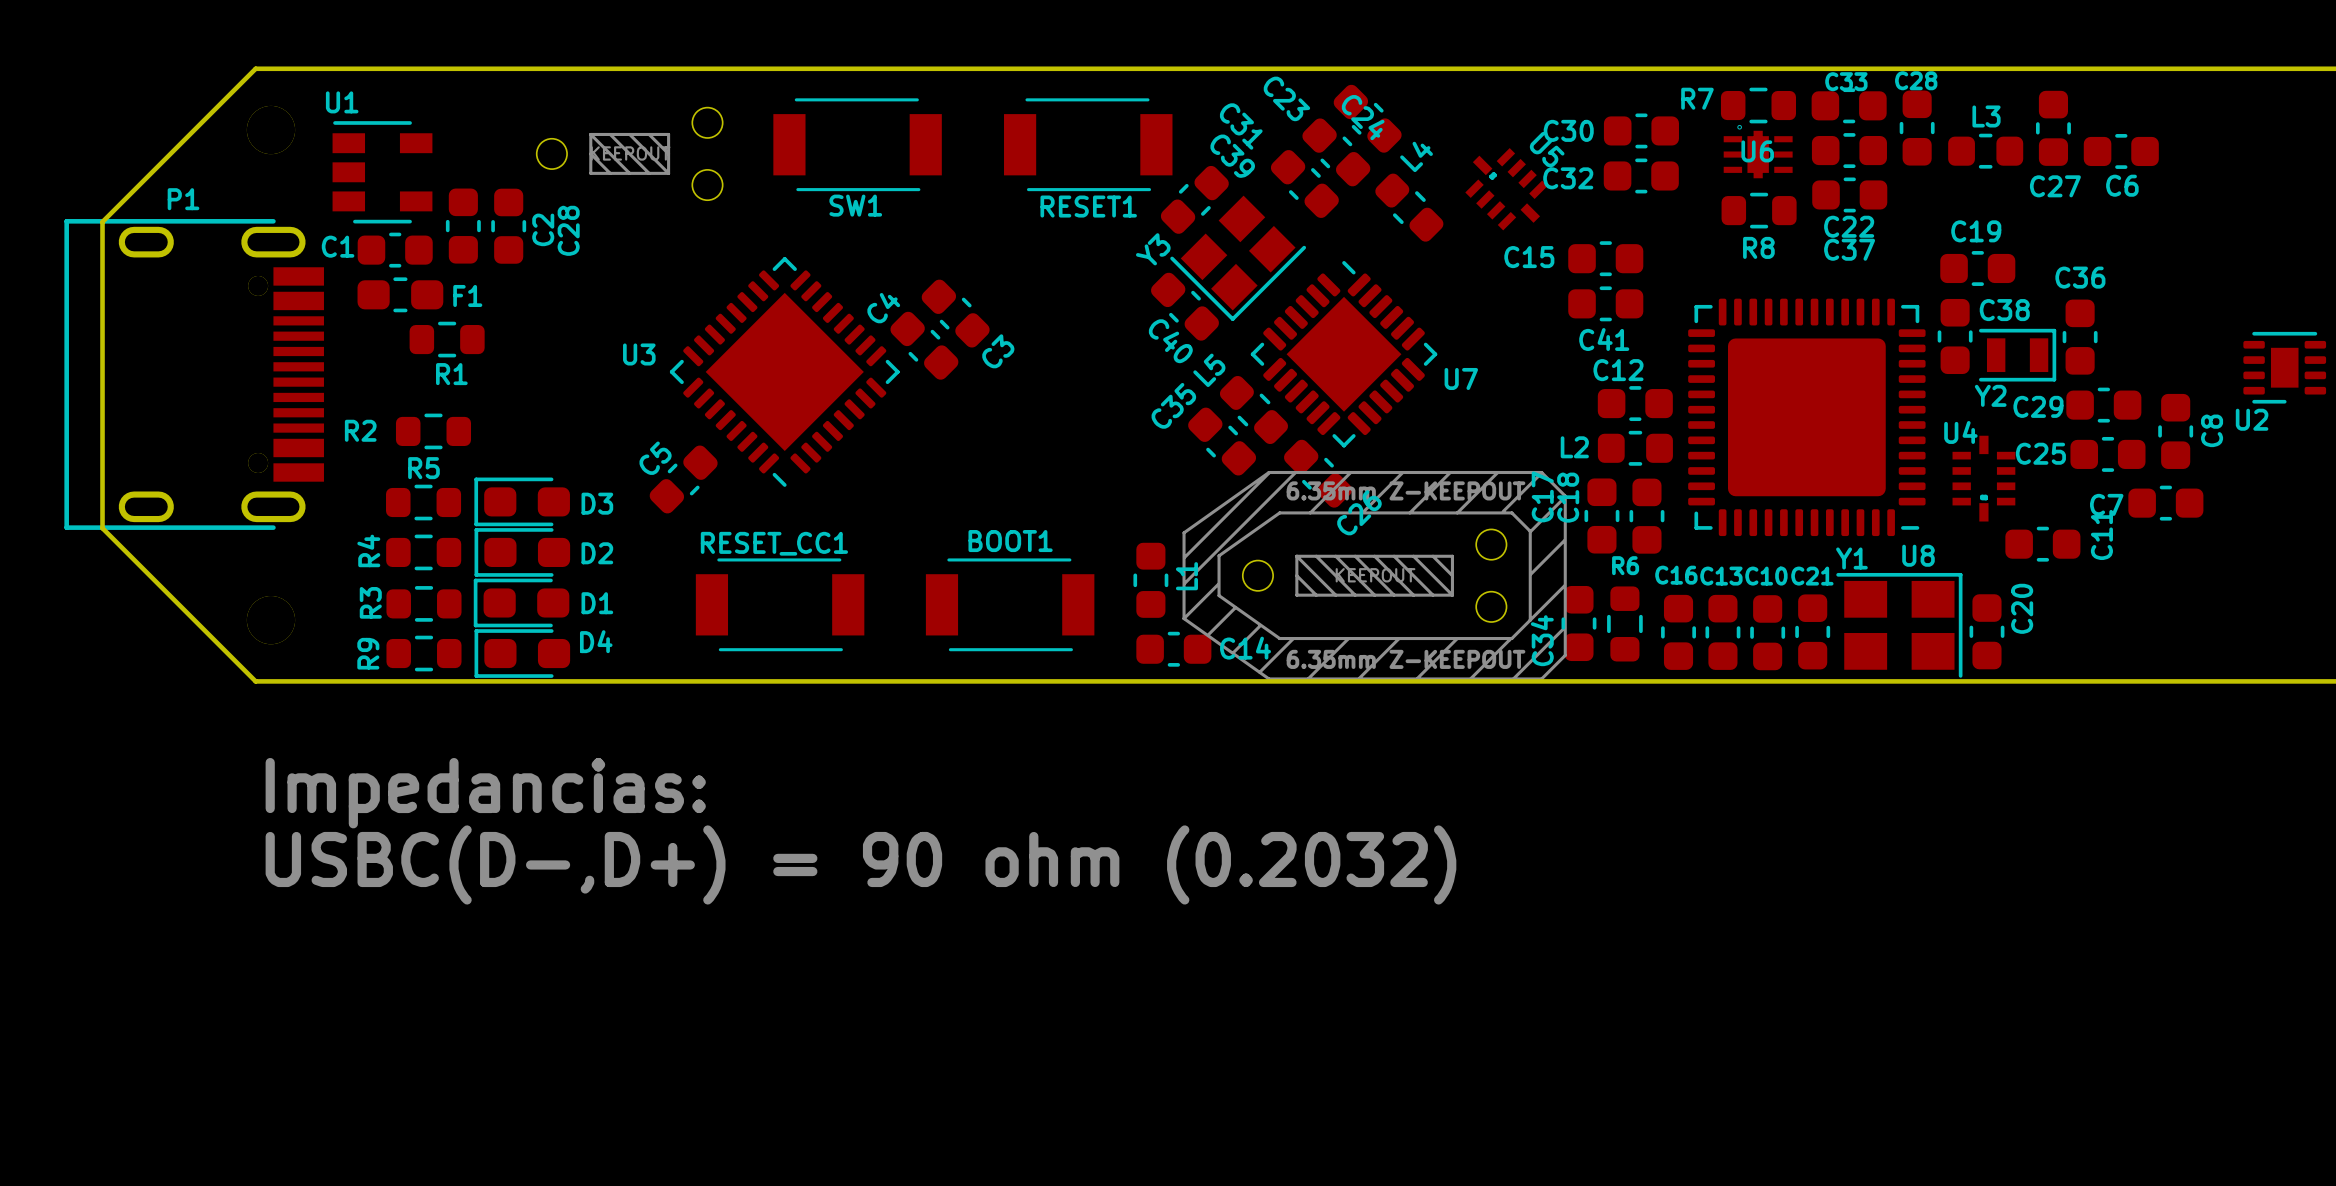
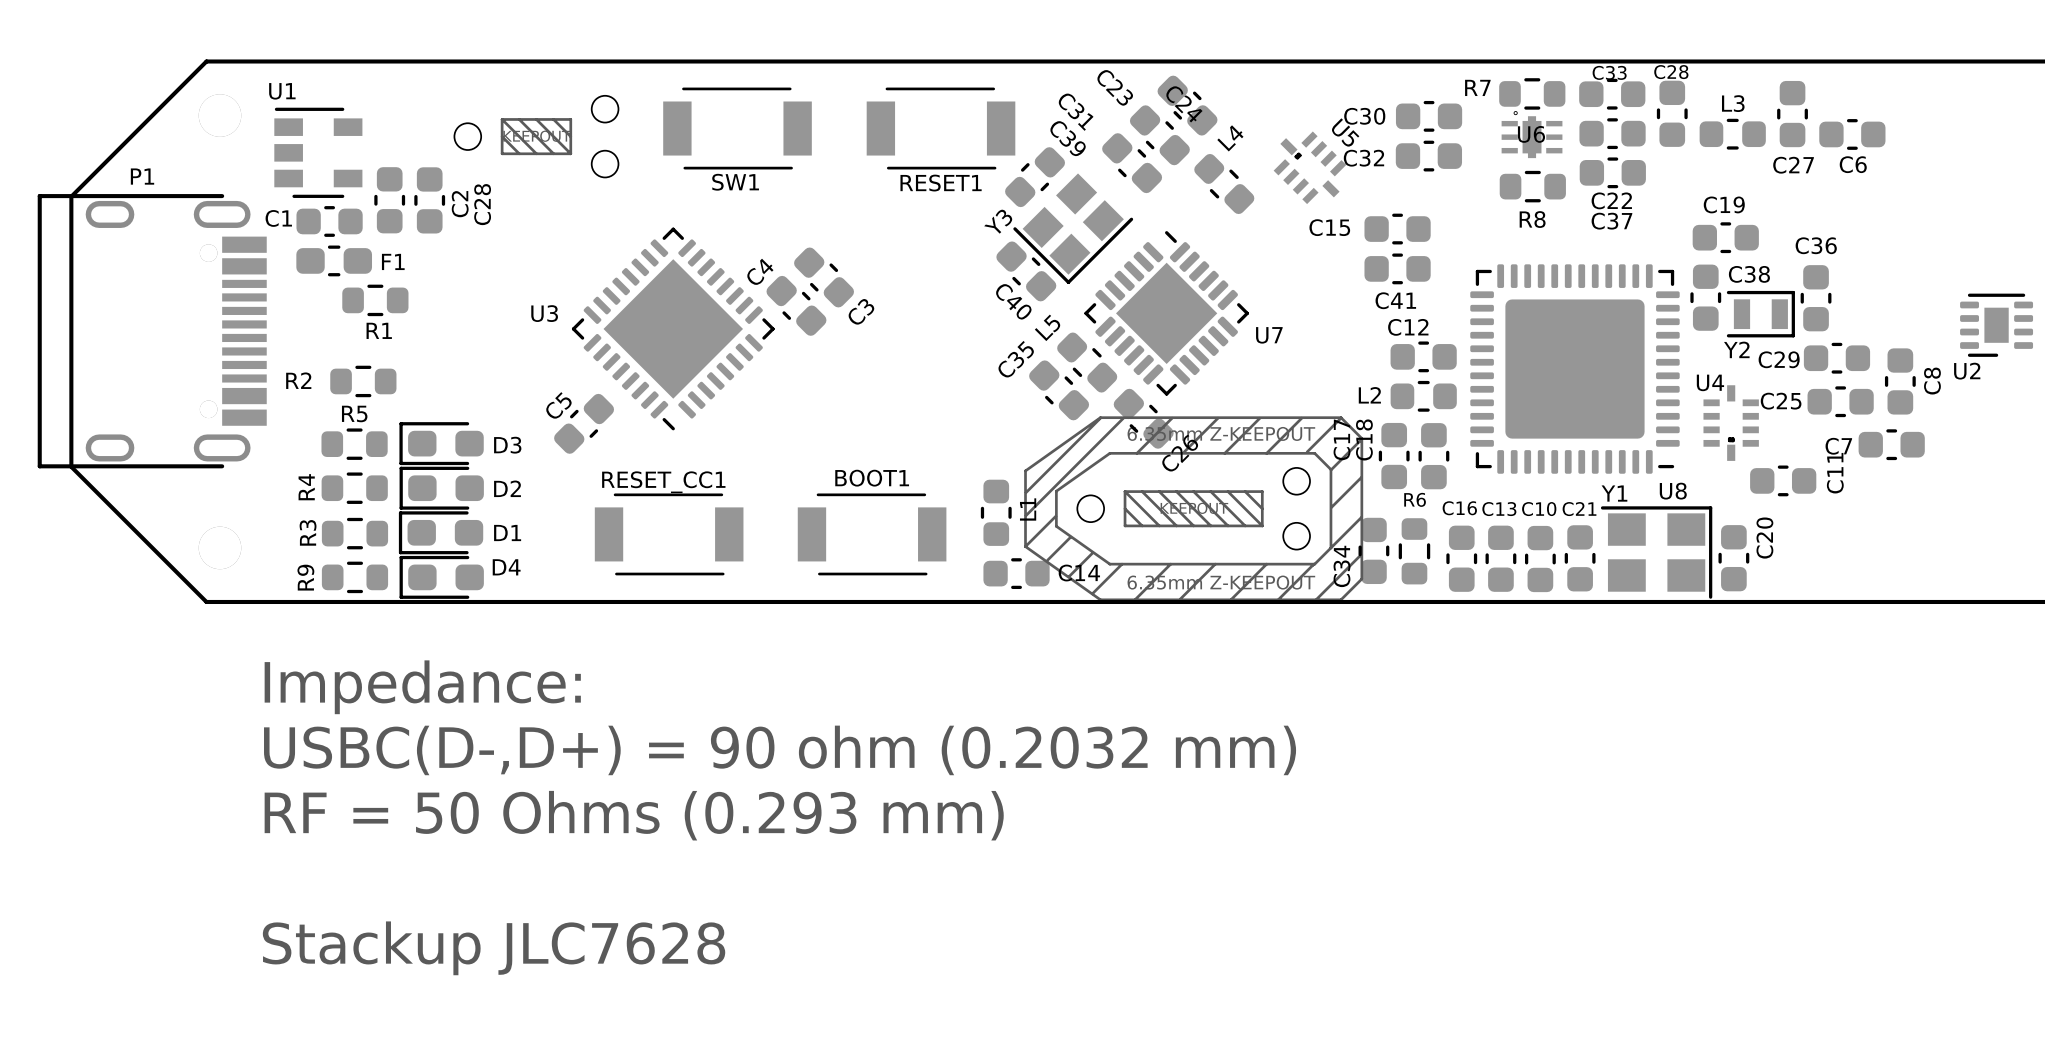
text: Impedancias: (485, 793) -> Impedance: (422, 687)
text: USBC(D-,D+) = 90 ohm (0.2032) (860, 864) -> USBC(D-,D+) = 90 ohm (0.2032 mm) (780, 750)
text: none -> RF = 50 Ohms (0.293 mm) (634, 815)
text: none -> Stackup JLC7628 (494, 948)

